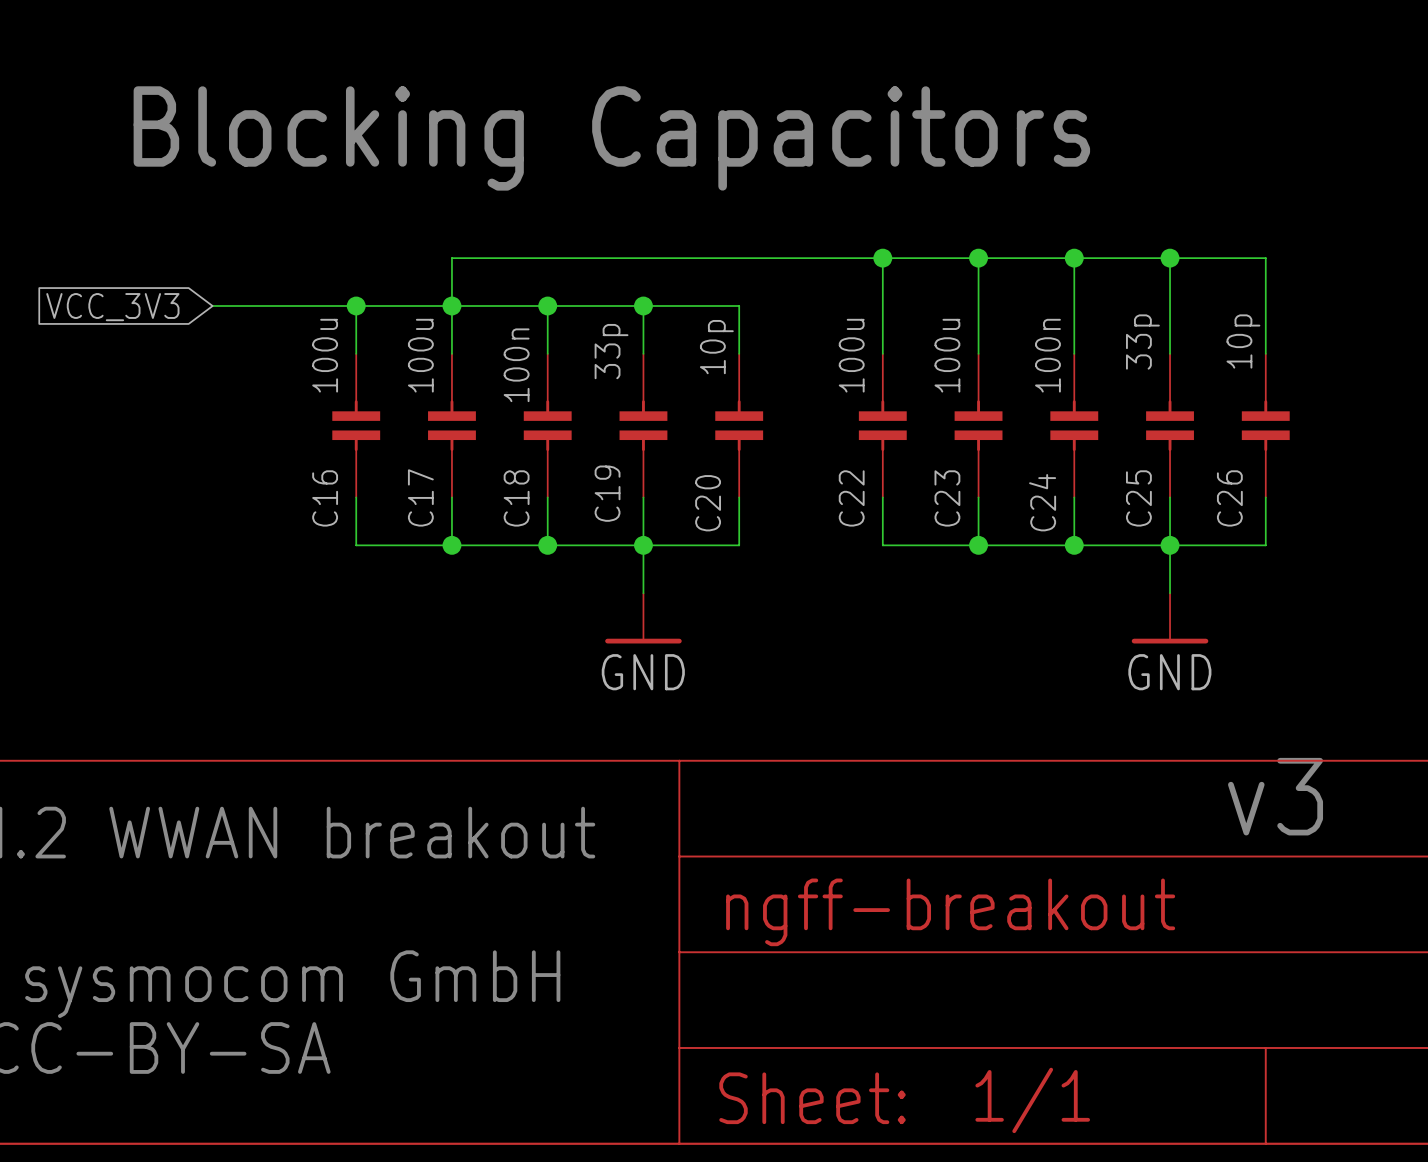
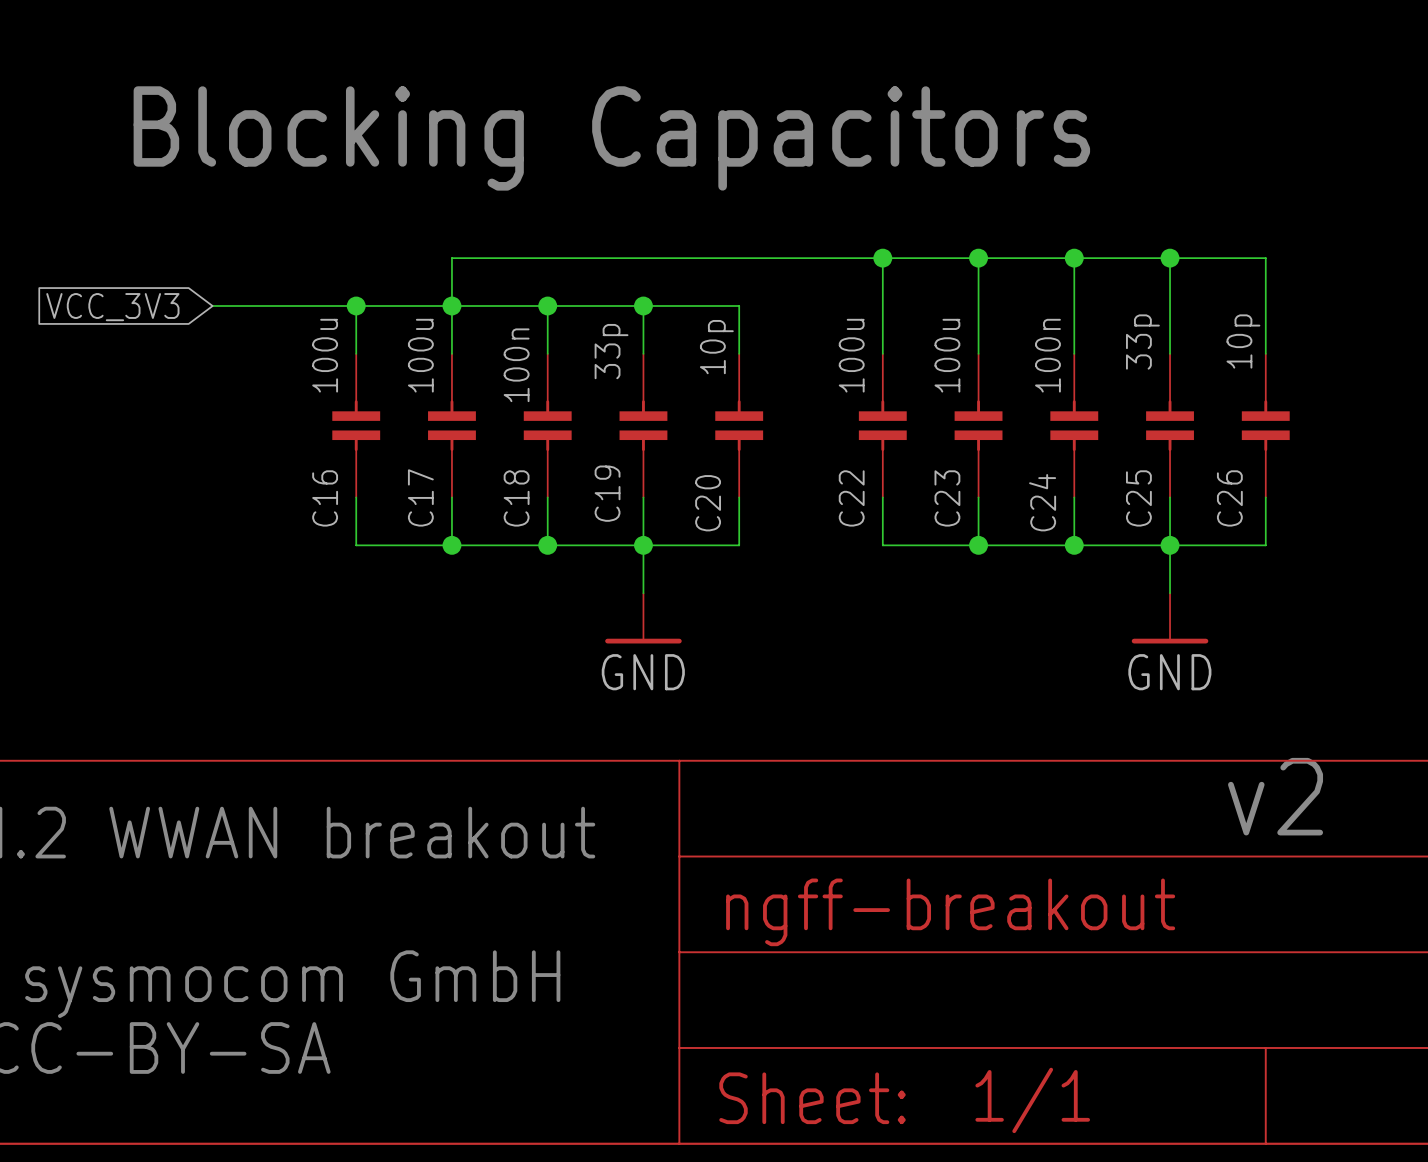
text: v3 (1275, 796) -> v2 (1275, 796)

